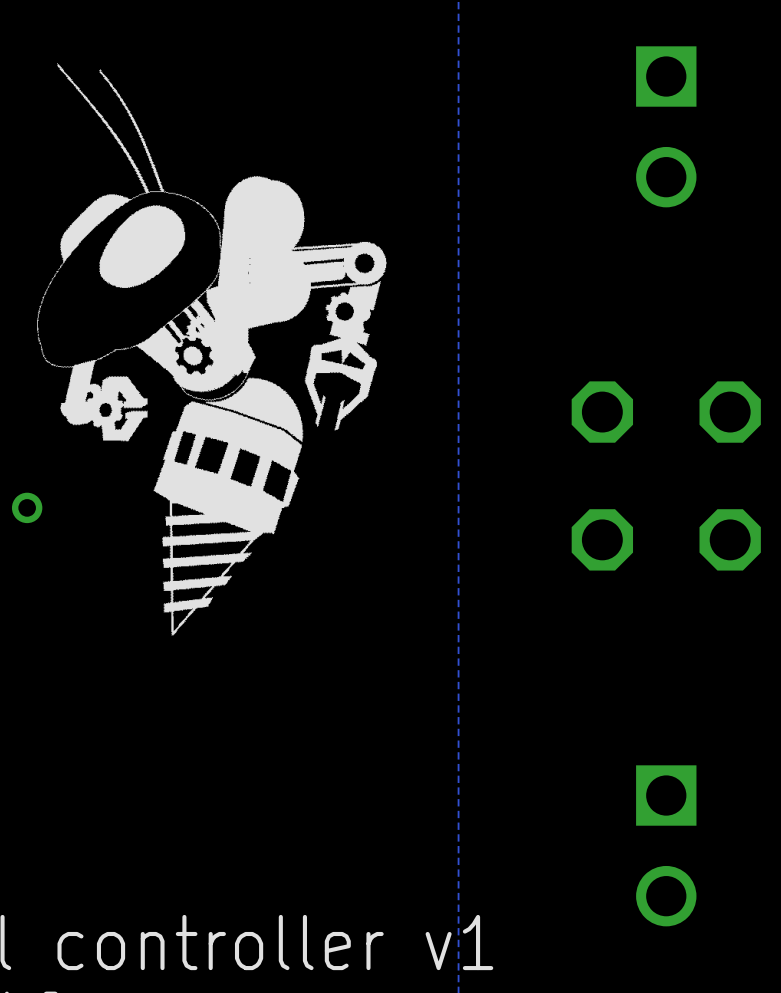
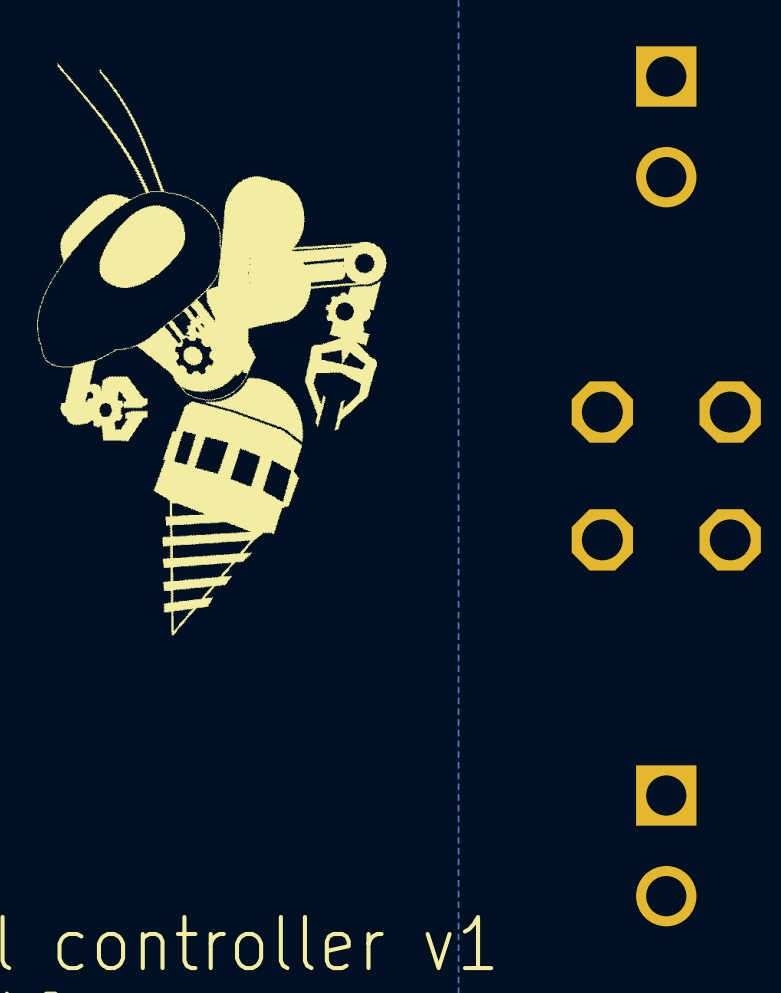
via: (27, 507) -> none

